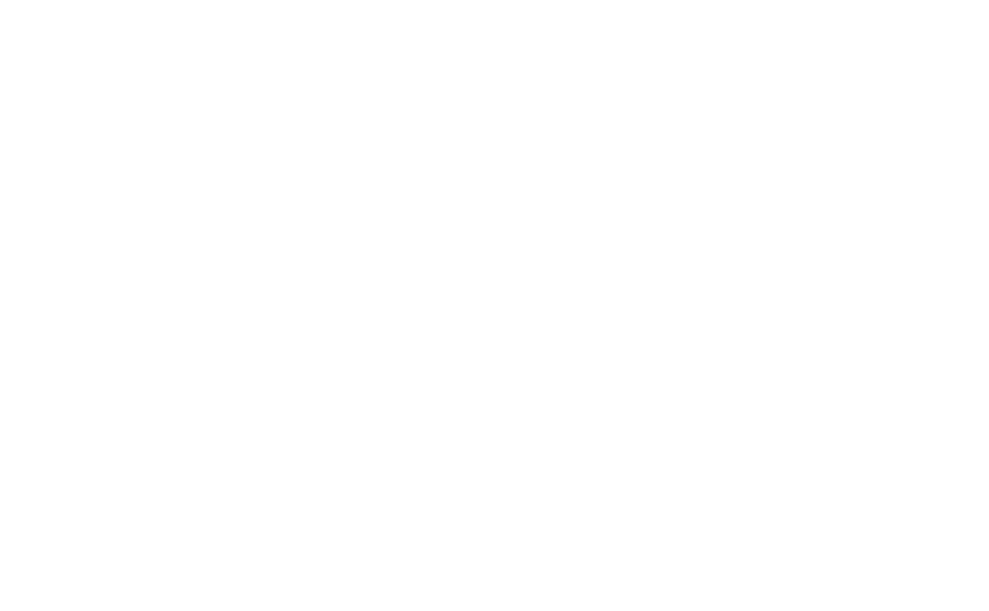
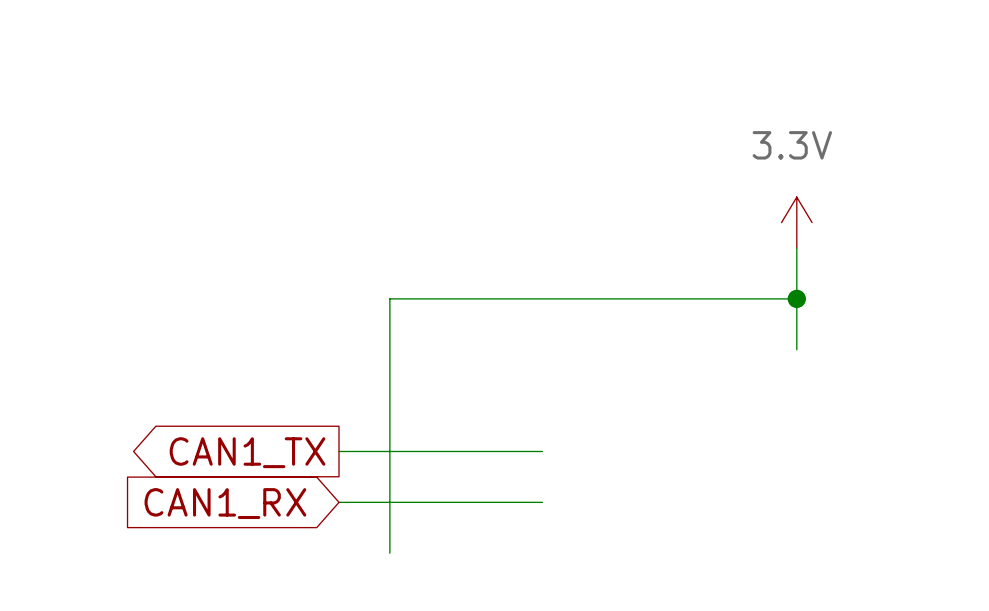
power symbol: none -> 3.3V (796, 222)
wire: none -> (796, 248) (796, 349)
wire: none -> (796, 298) (389, 298) (389, 553)
junction: none -> (796, 298)
wire: none -> (339, 451) (542, 451)
global label: none -> CAN1_TX (247, 452)
wire: none -> (339, 502) (542, 502)
global label: none -> CAN1_RX (225, 503)

